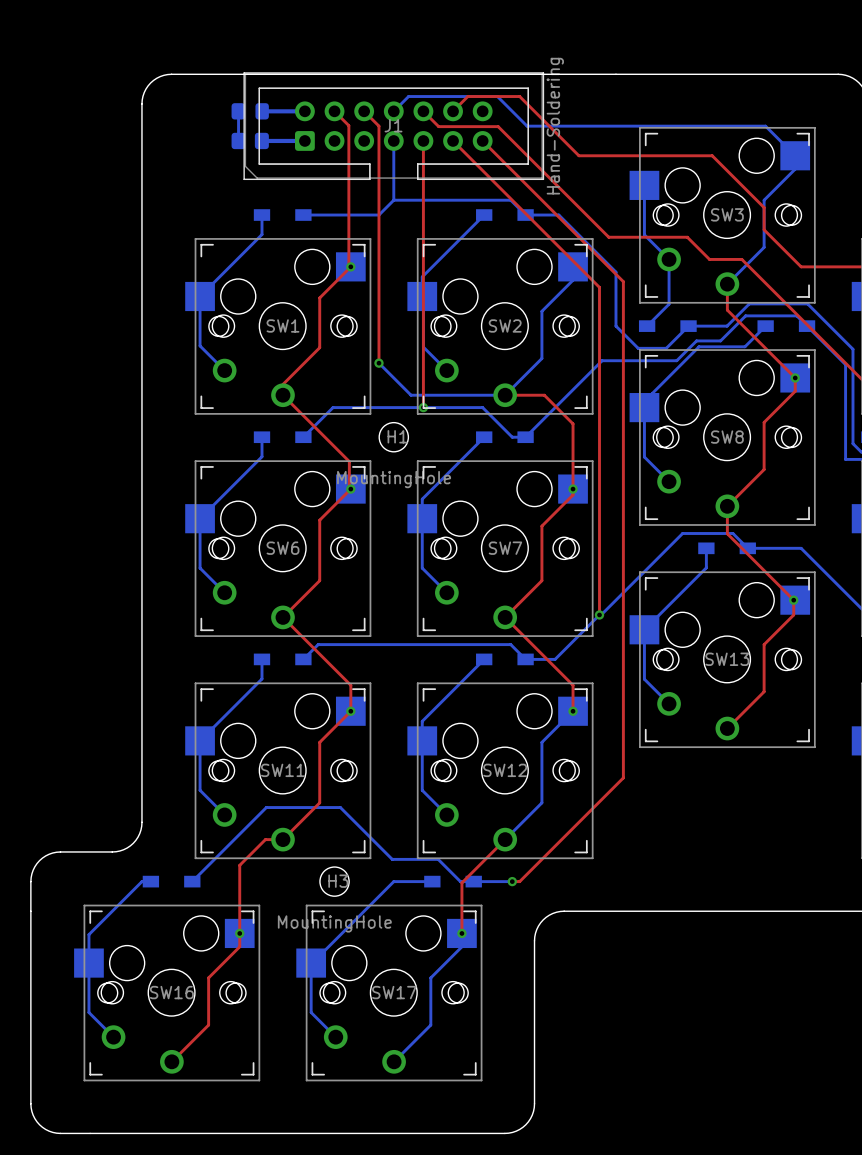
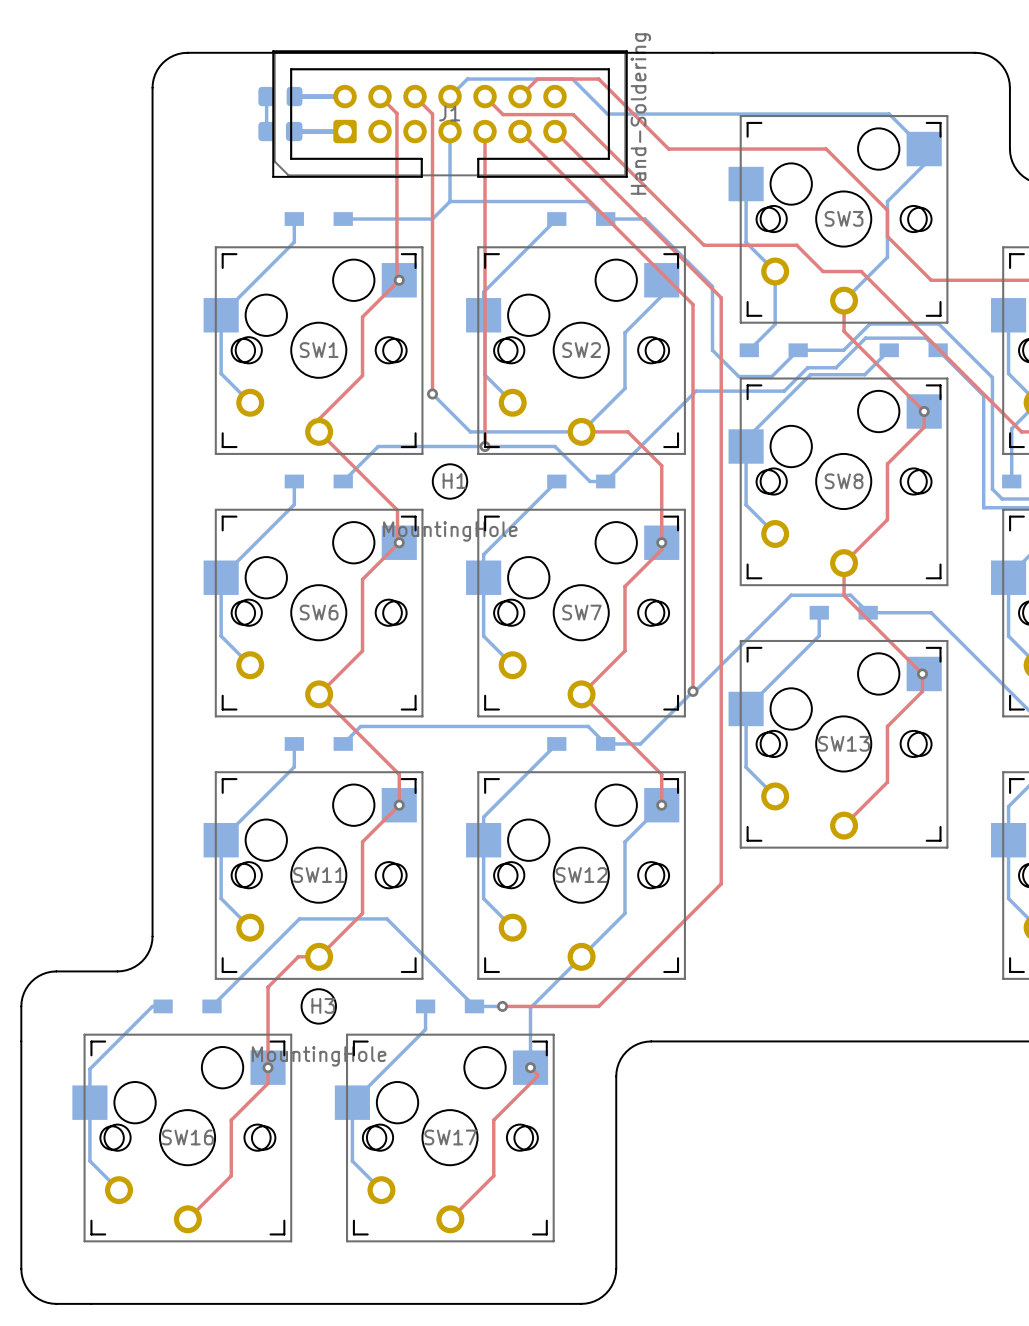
top track: (505, 839) (461, 882) (461, 933) -> (450, 1219) (493, 1175) (493, 1120) (537, 1076) (530, 1067)
bottom track: (392, 859) (438, 859) (460, 881) (512, 881) -> (448, 980) (474, 1006)
H3 position: (334, 881) -> (318, 1006)
bottom track: none -> (425, 1006) (425, 1029) (352, 1102)
bottom track: (414, 881) (393, 881) (312, 963) -> none
top track: none -> (502, 1006) (589, 1006)
via: none -> (502, 1006)
part position: (453, 881) -> (450, 1006)
via: (512, 881) -> none
bottom track: (461, 933) (461, 946) (430, 977) (430, 1025) (394, 1061) -> (530, 1067) (530, 1007) (581, 956)

